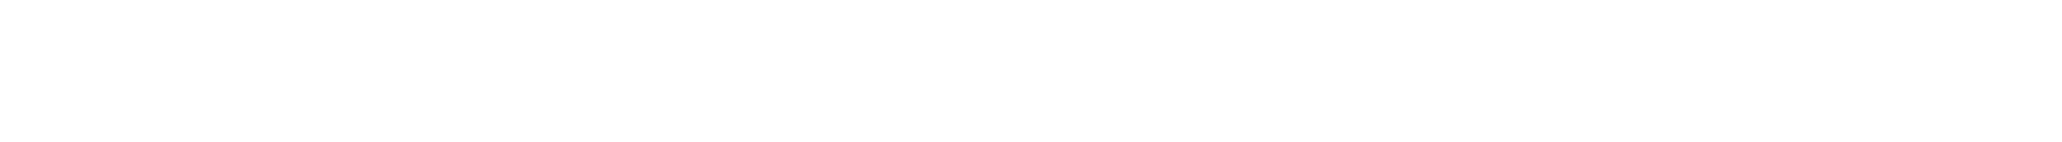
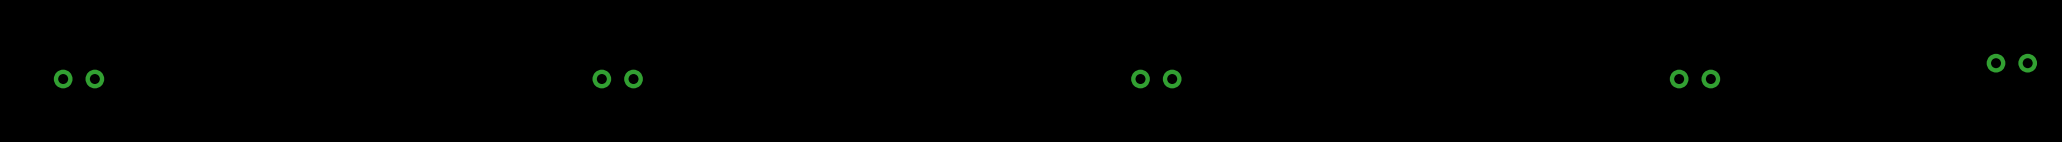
part: none -> (2011, 63)
part: none -> (79, 79)
part: none -> (617, 79)
part: none -> (1156, 79)
part: none -> (1695, 79)

